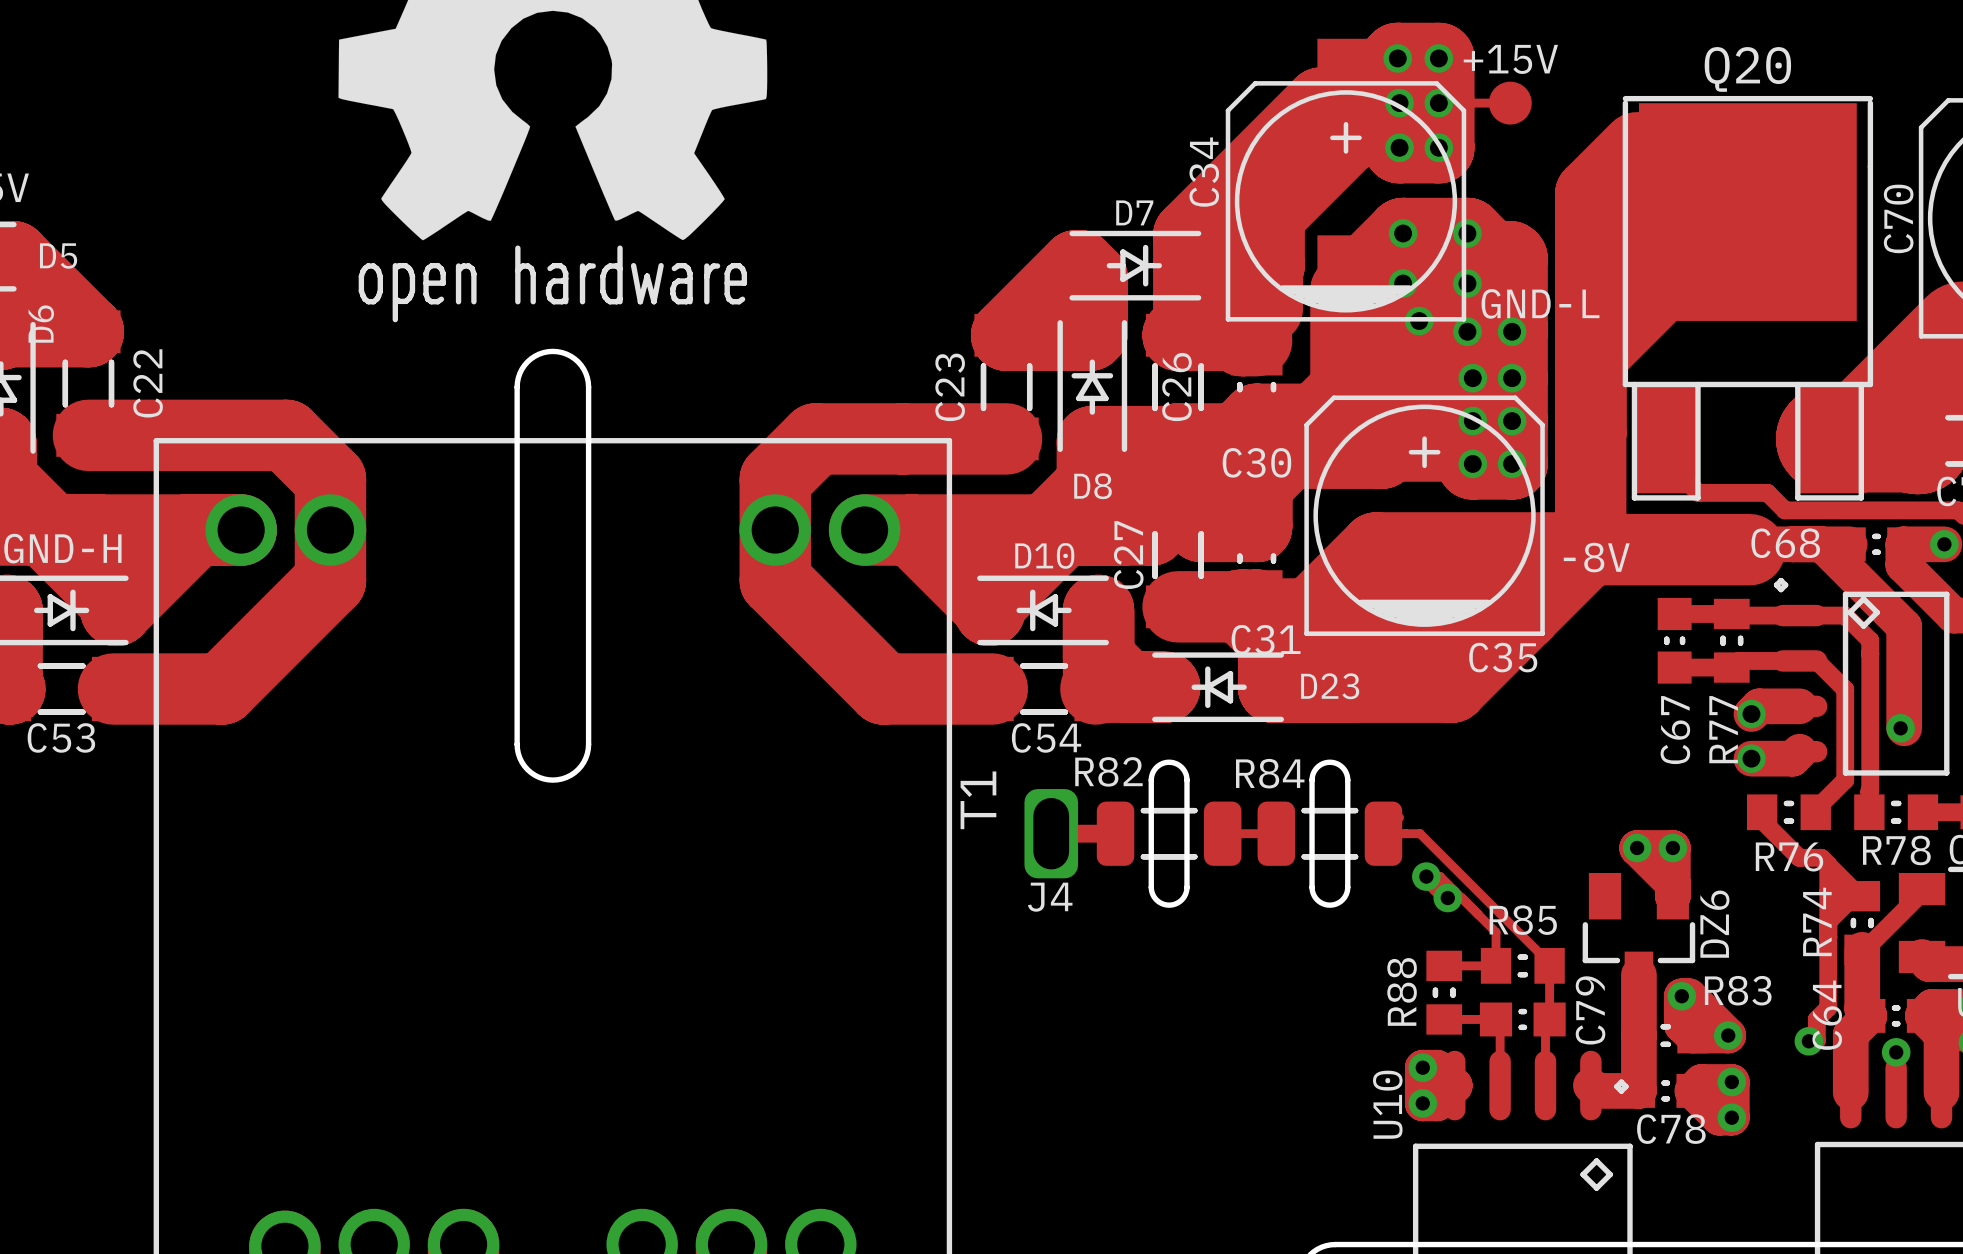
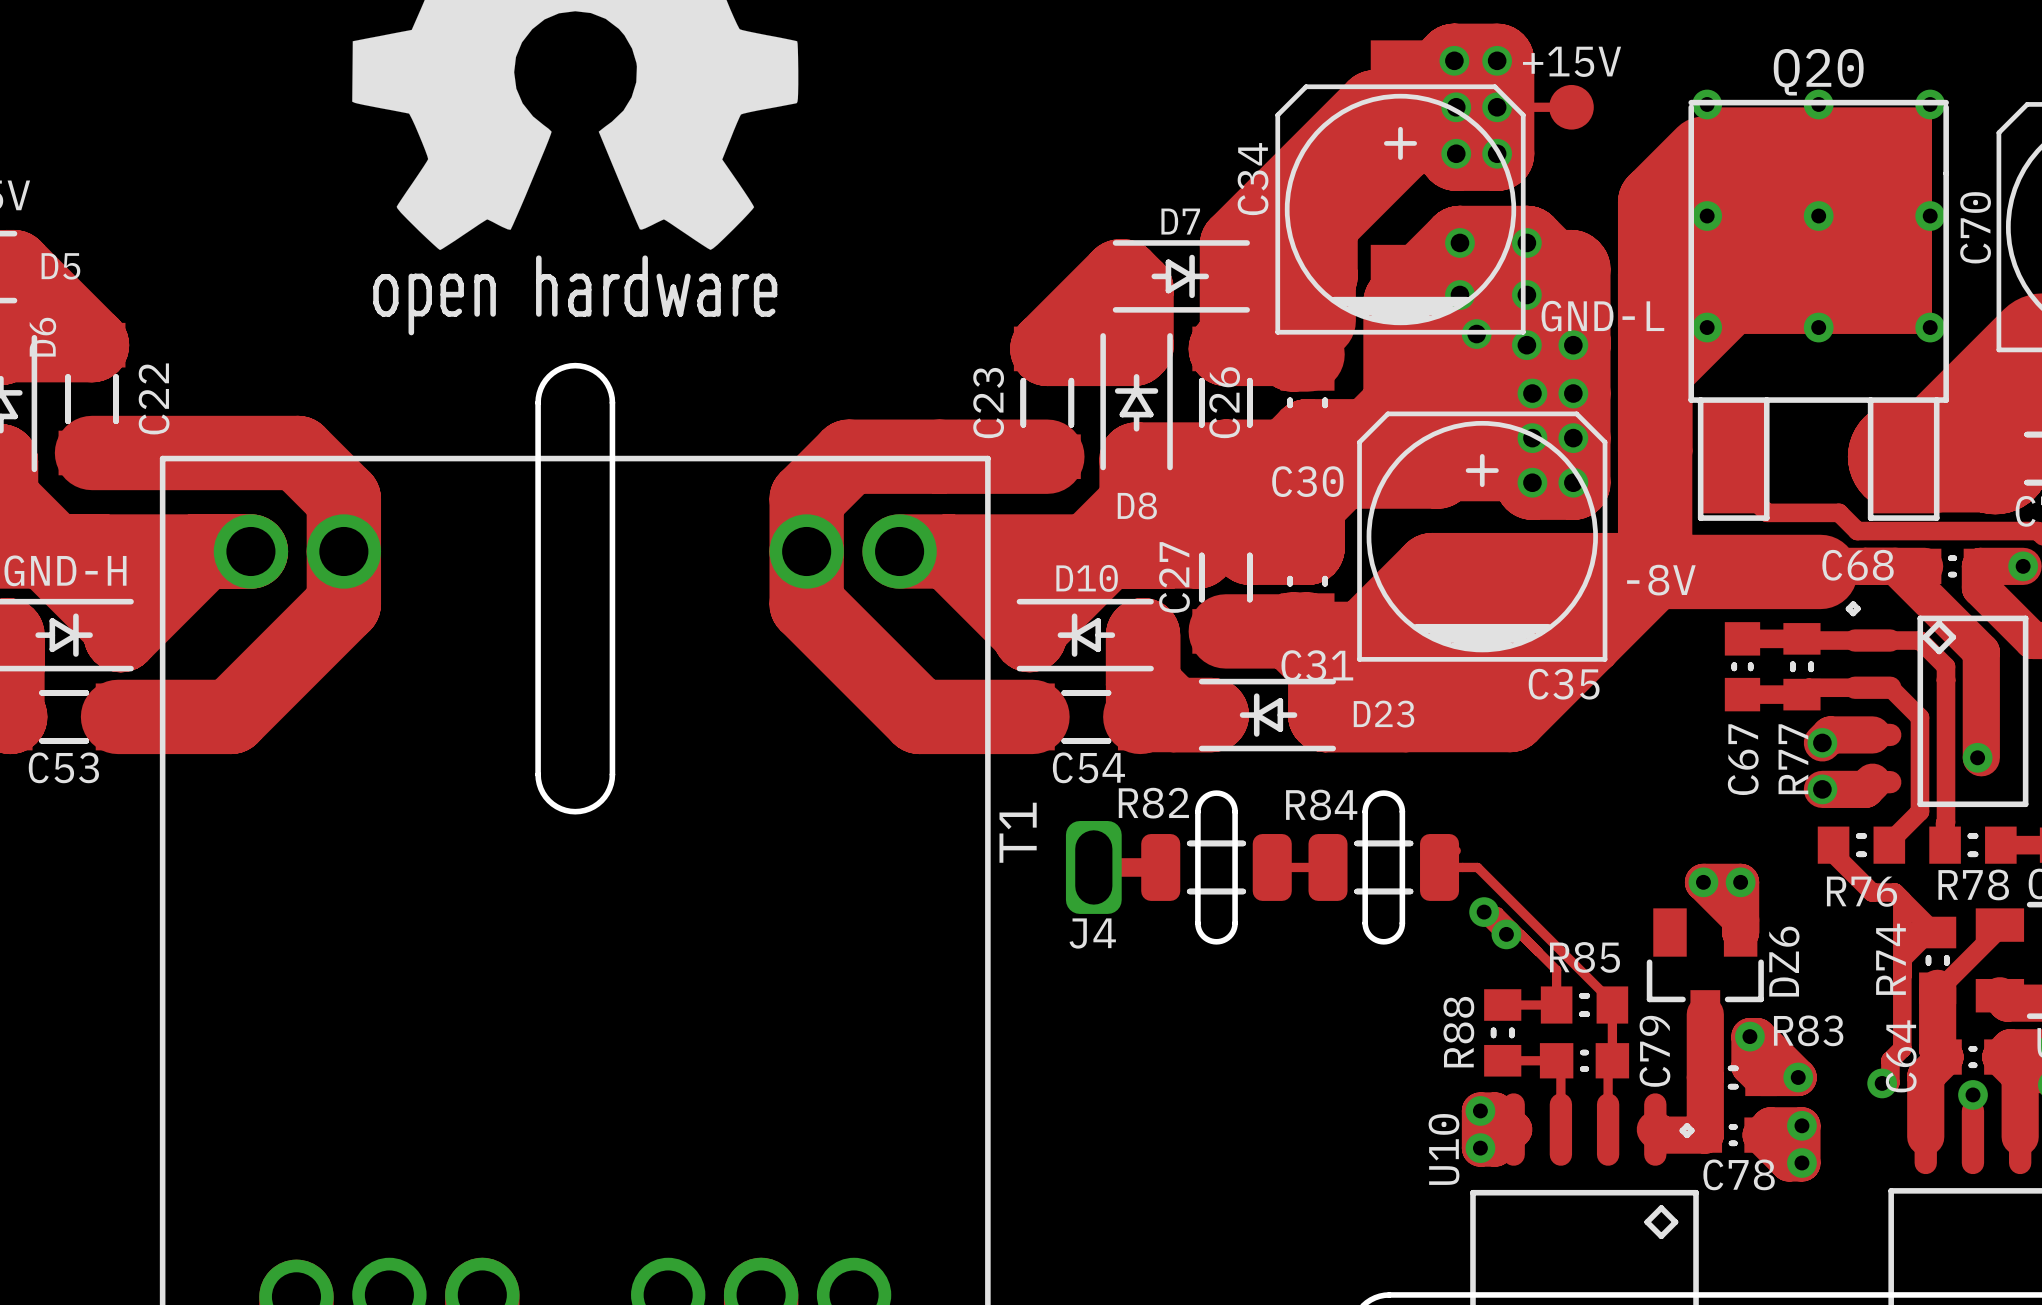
via: none -> (1707, 104)
via: none -> (1818, 104)
via: none -> (1930, 104)
via: none -> (1707, 216)
via: none -> (1818, 216)
via: none -> (1930, 216)
via: none -> (1707, 327)
via: none -> (1818, 327)
via: none -> (1930, 327)

